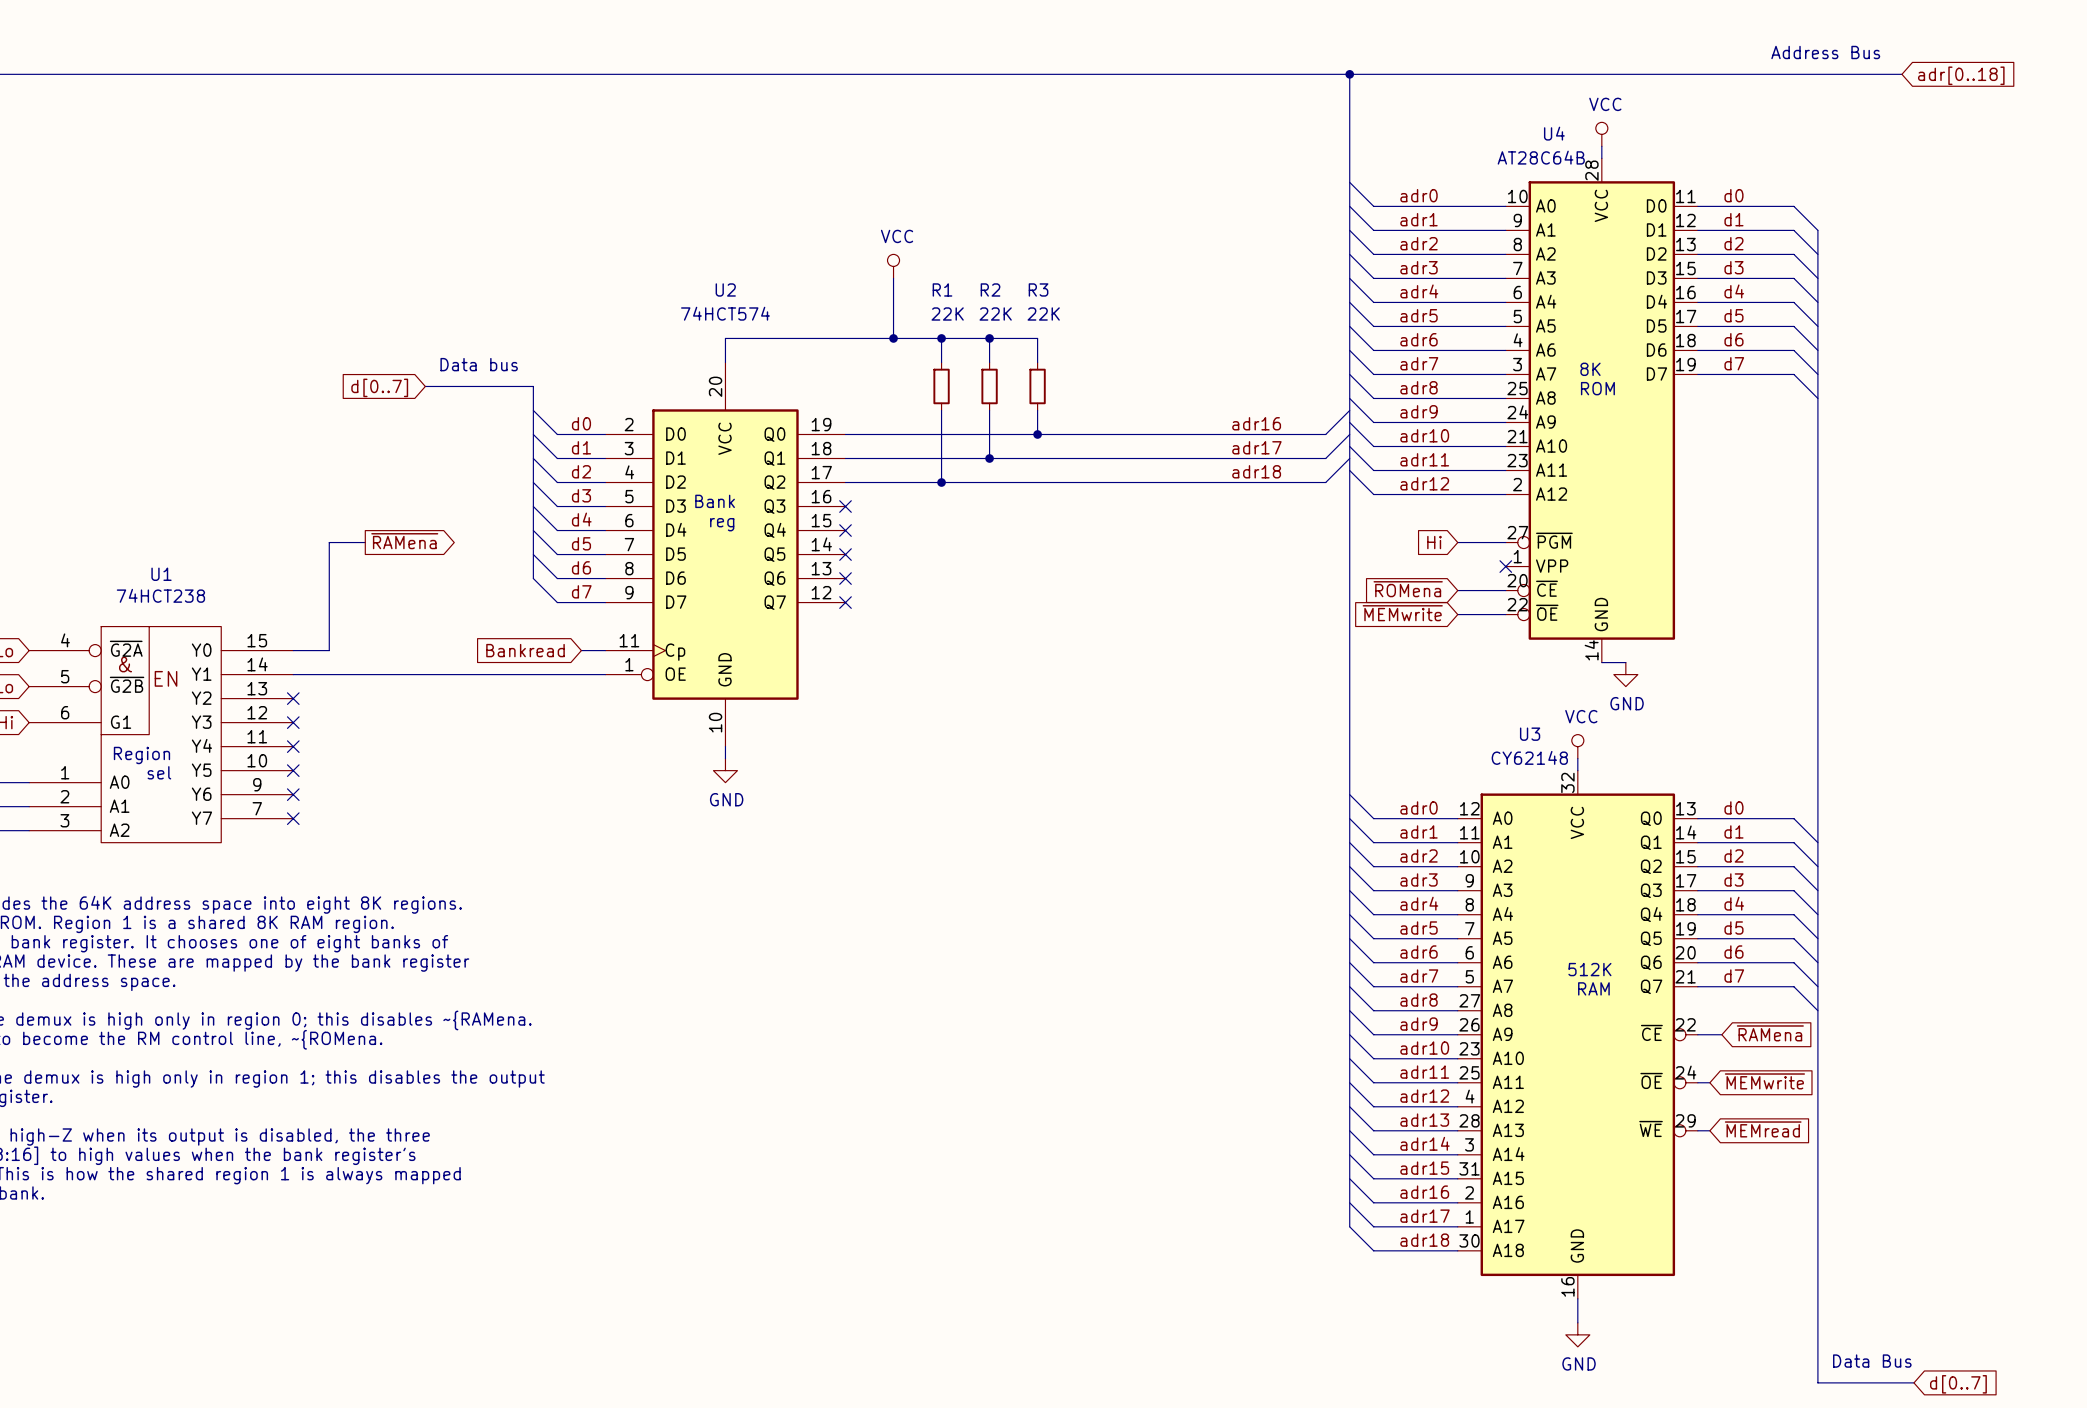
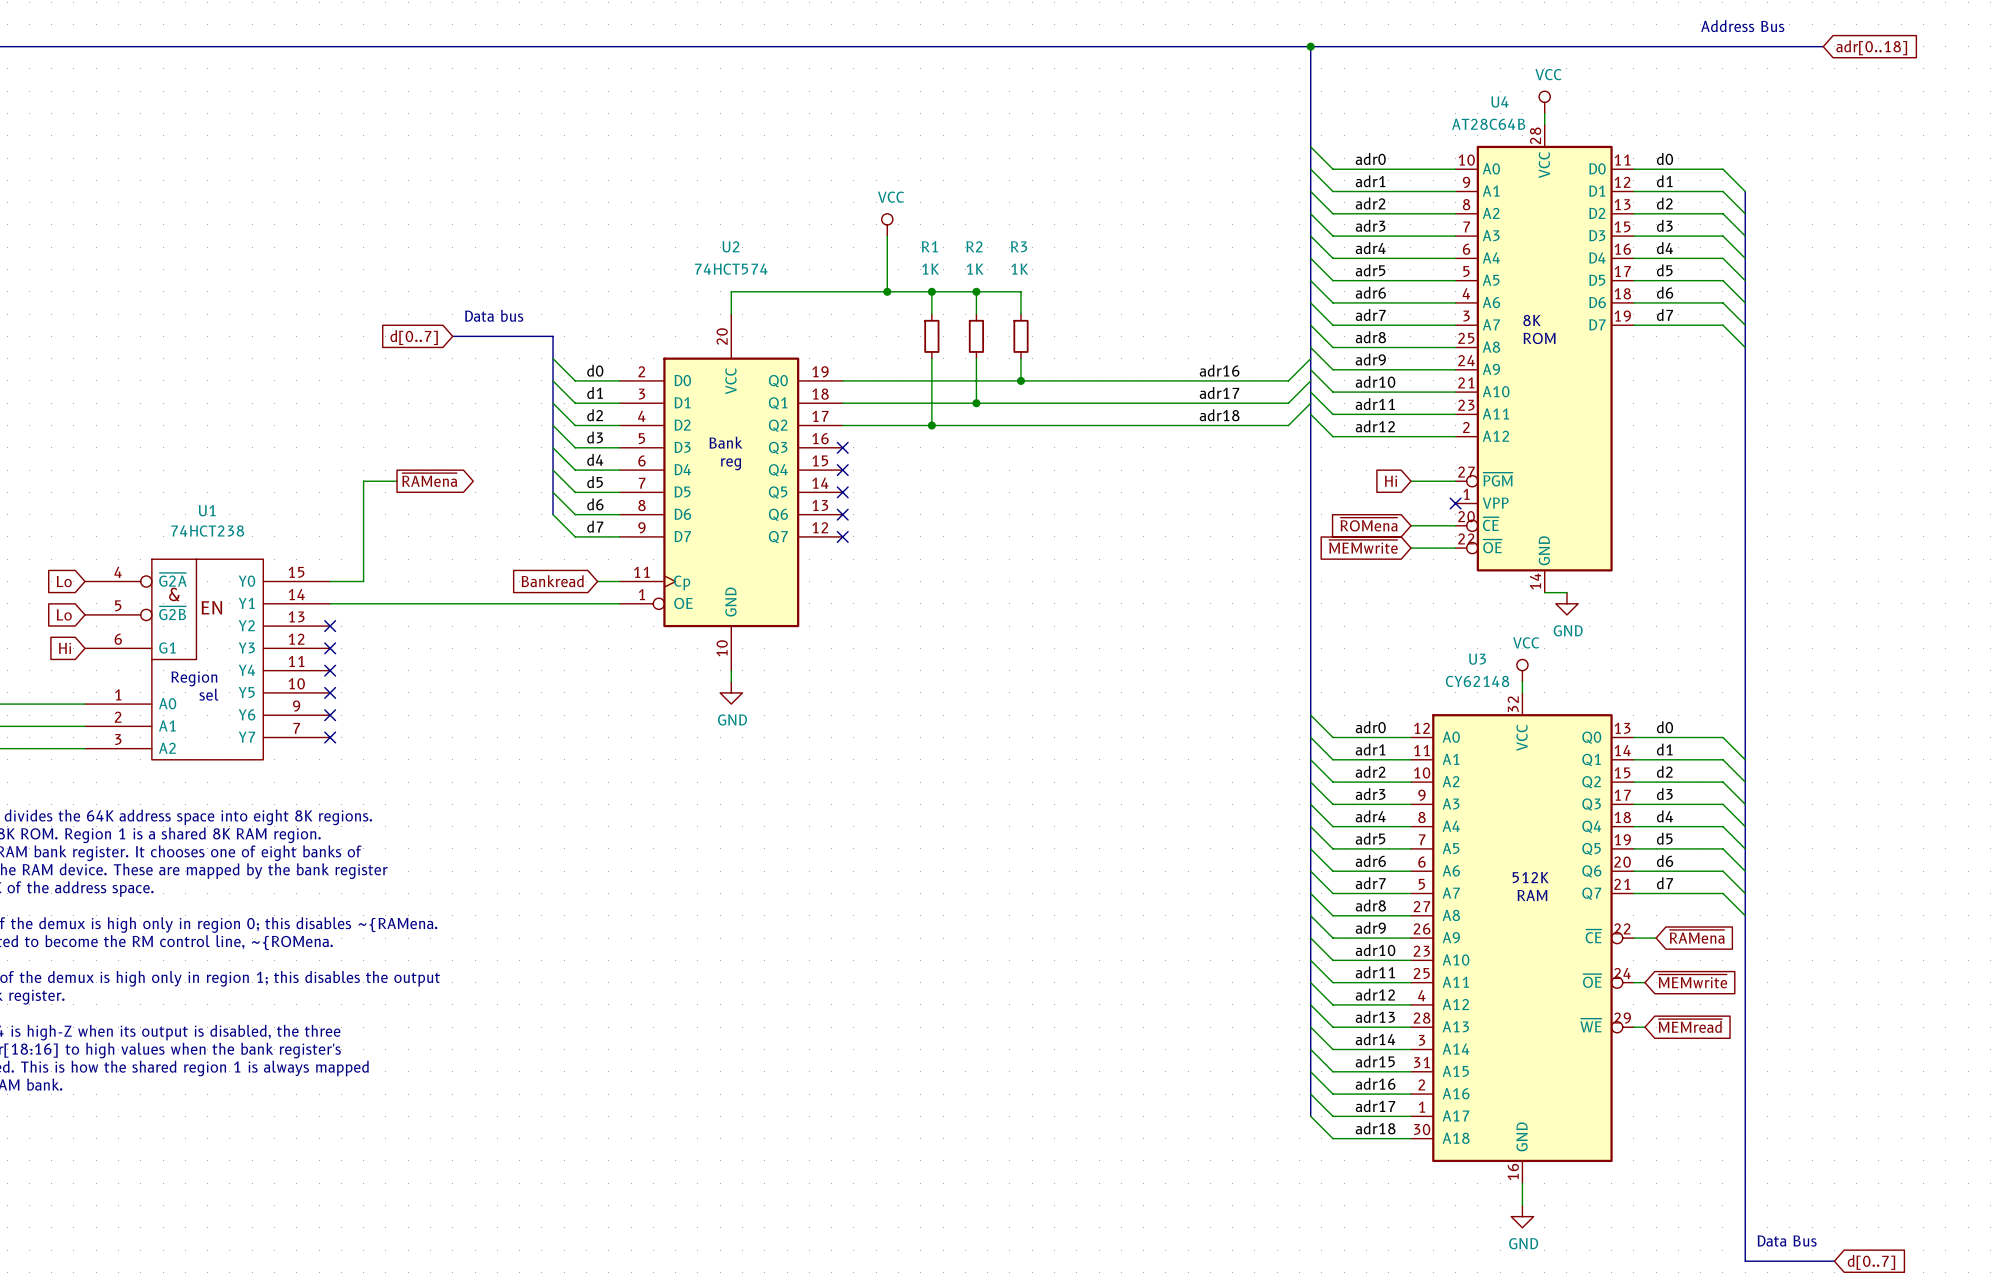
R1 value: 22K (947, 313) -> 1K (930, 269)
R2 value: 22K (995, 313) -> 1K (975, 269)
R3 value: 22K (1043, 313) -> 1K (1019, 269)

